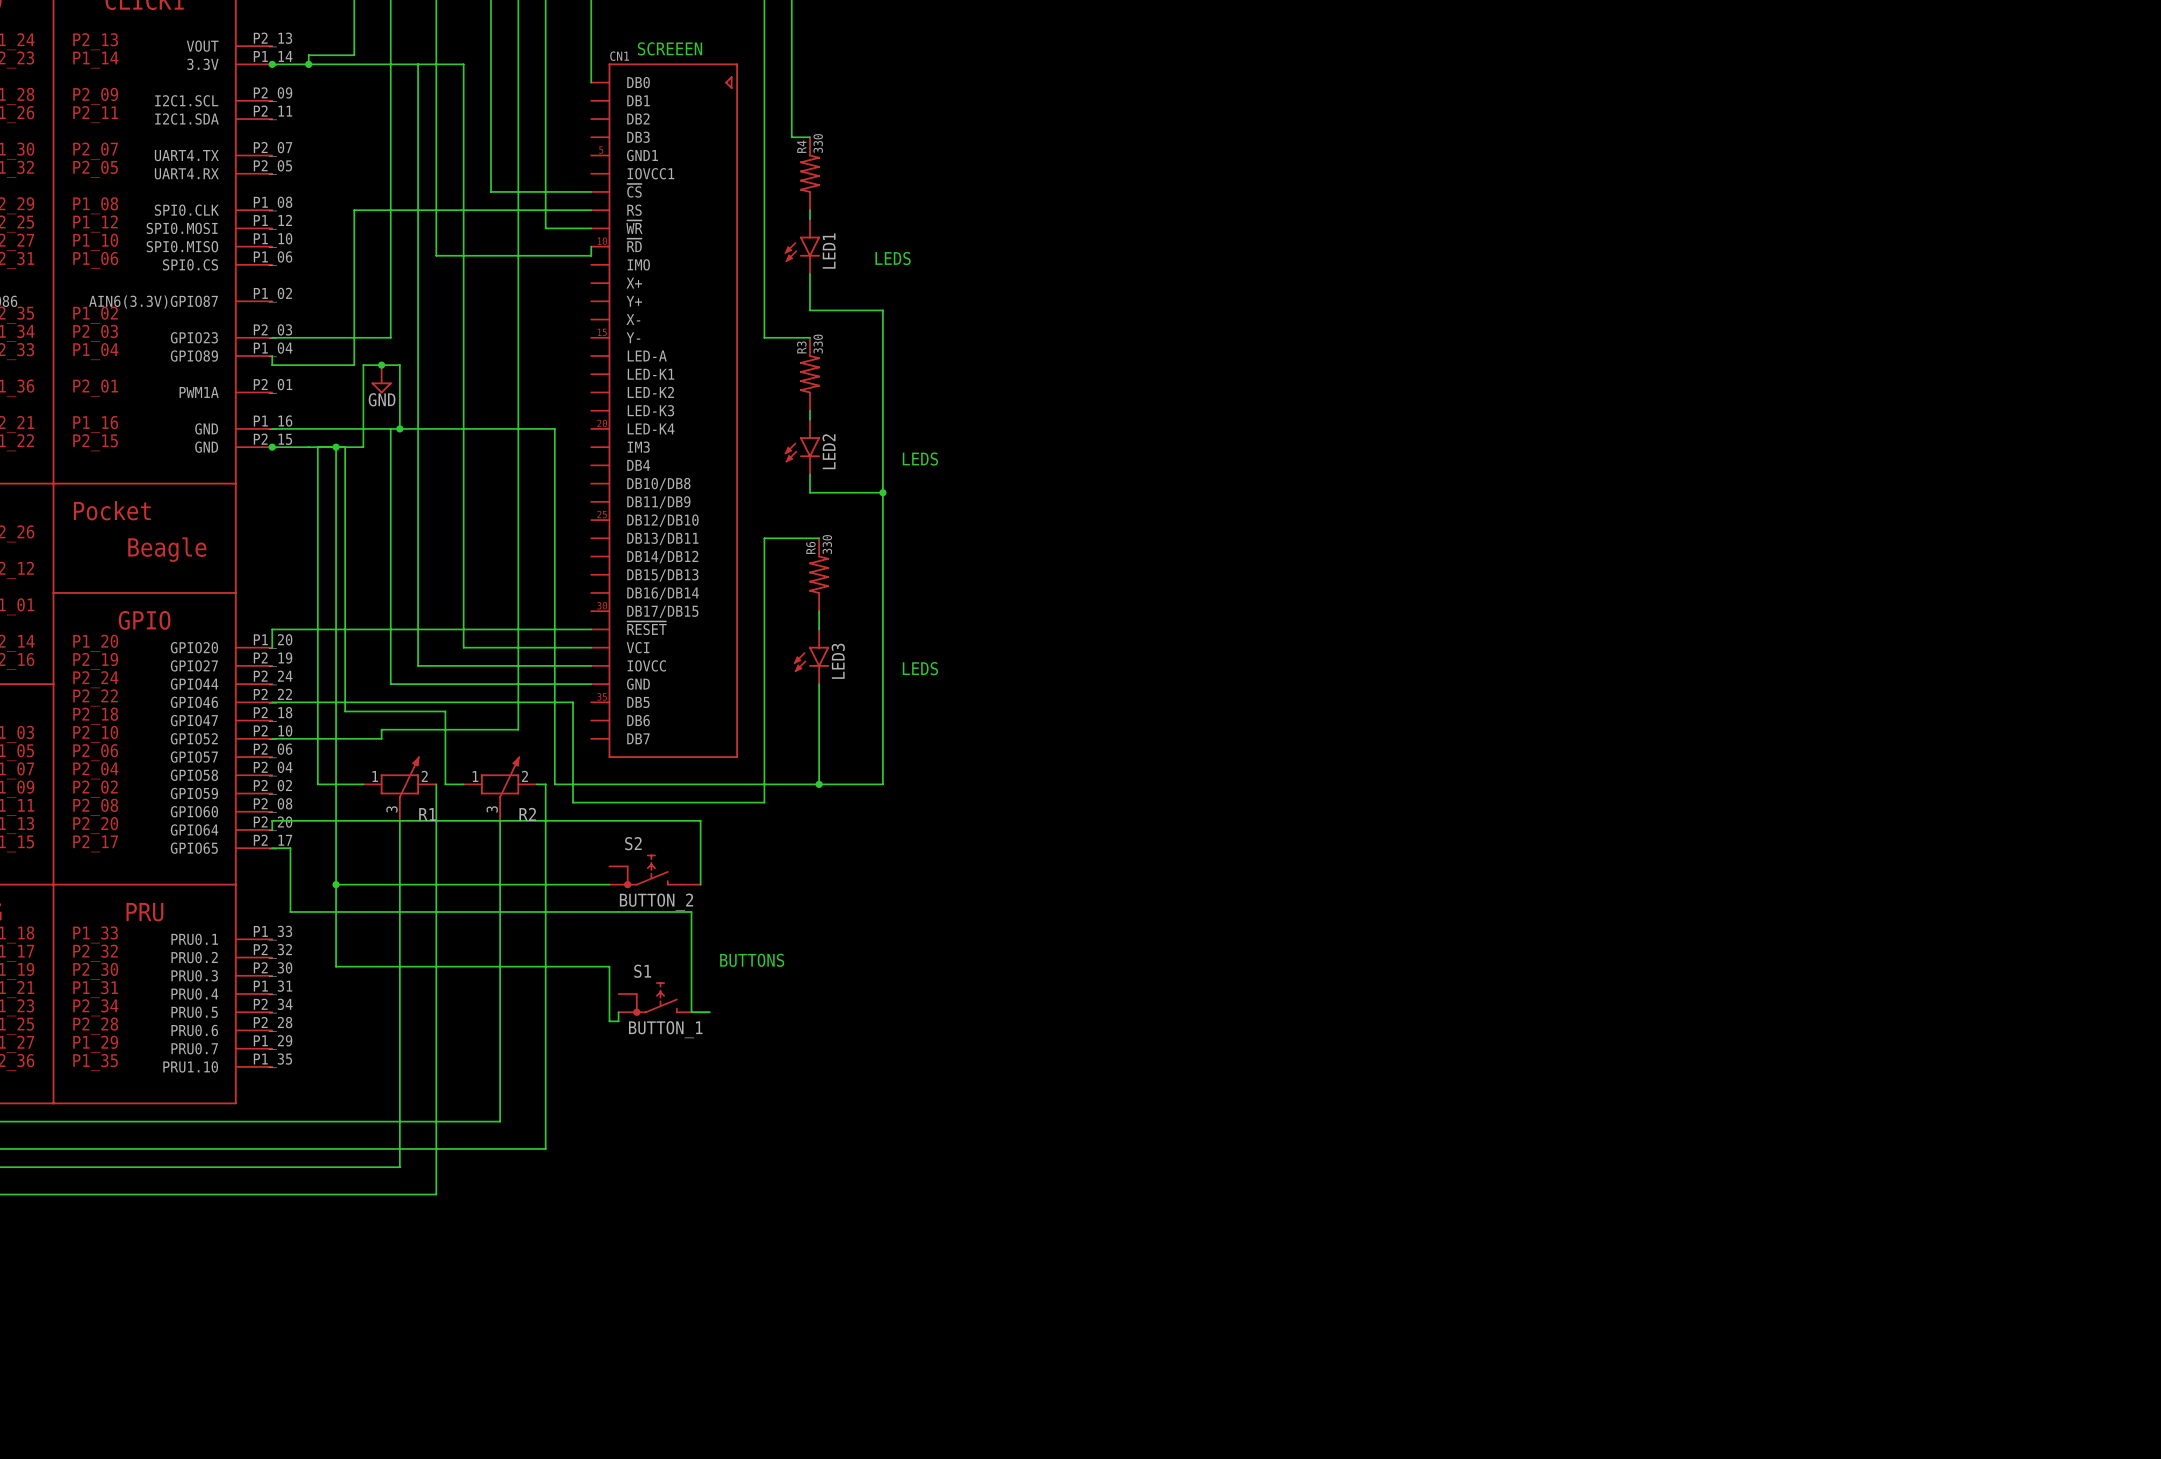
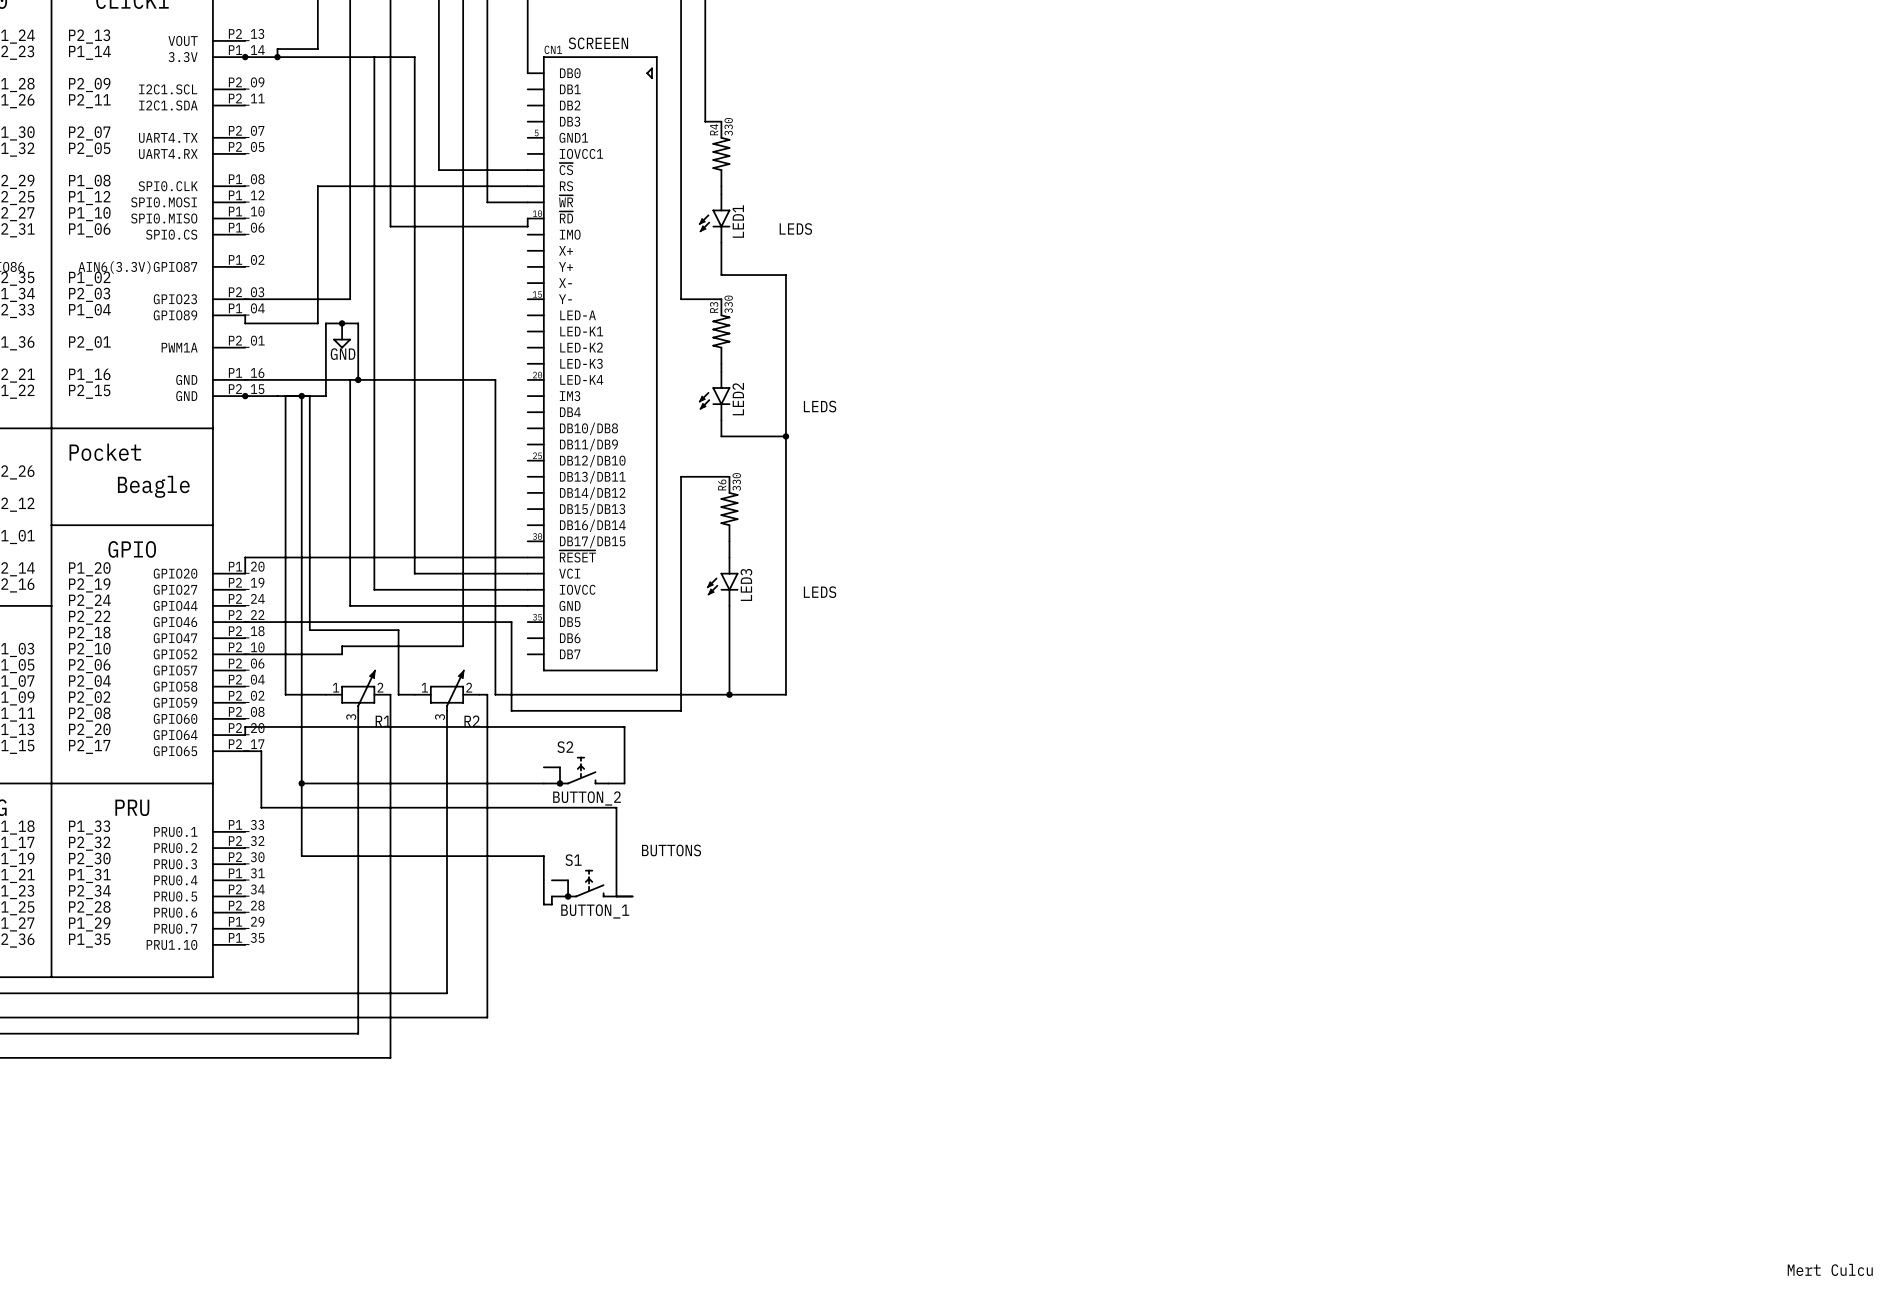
text: none -> Mert Culcu (1830, 1269)

